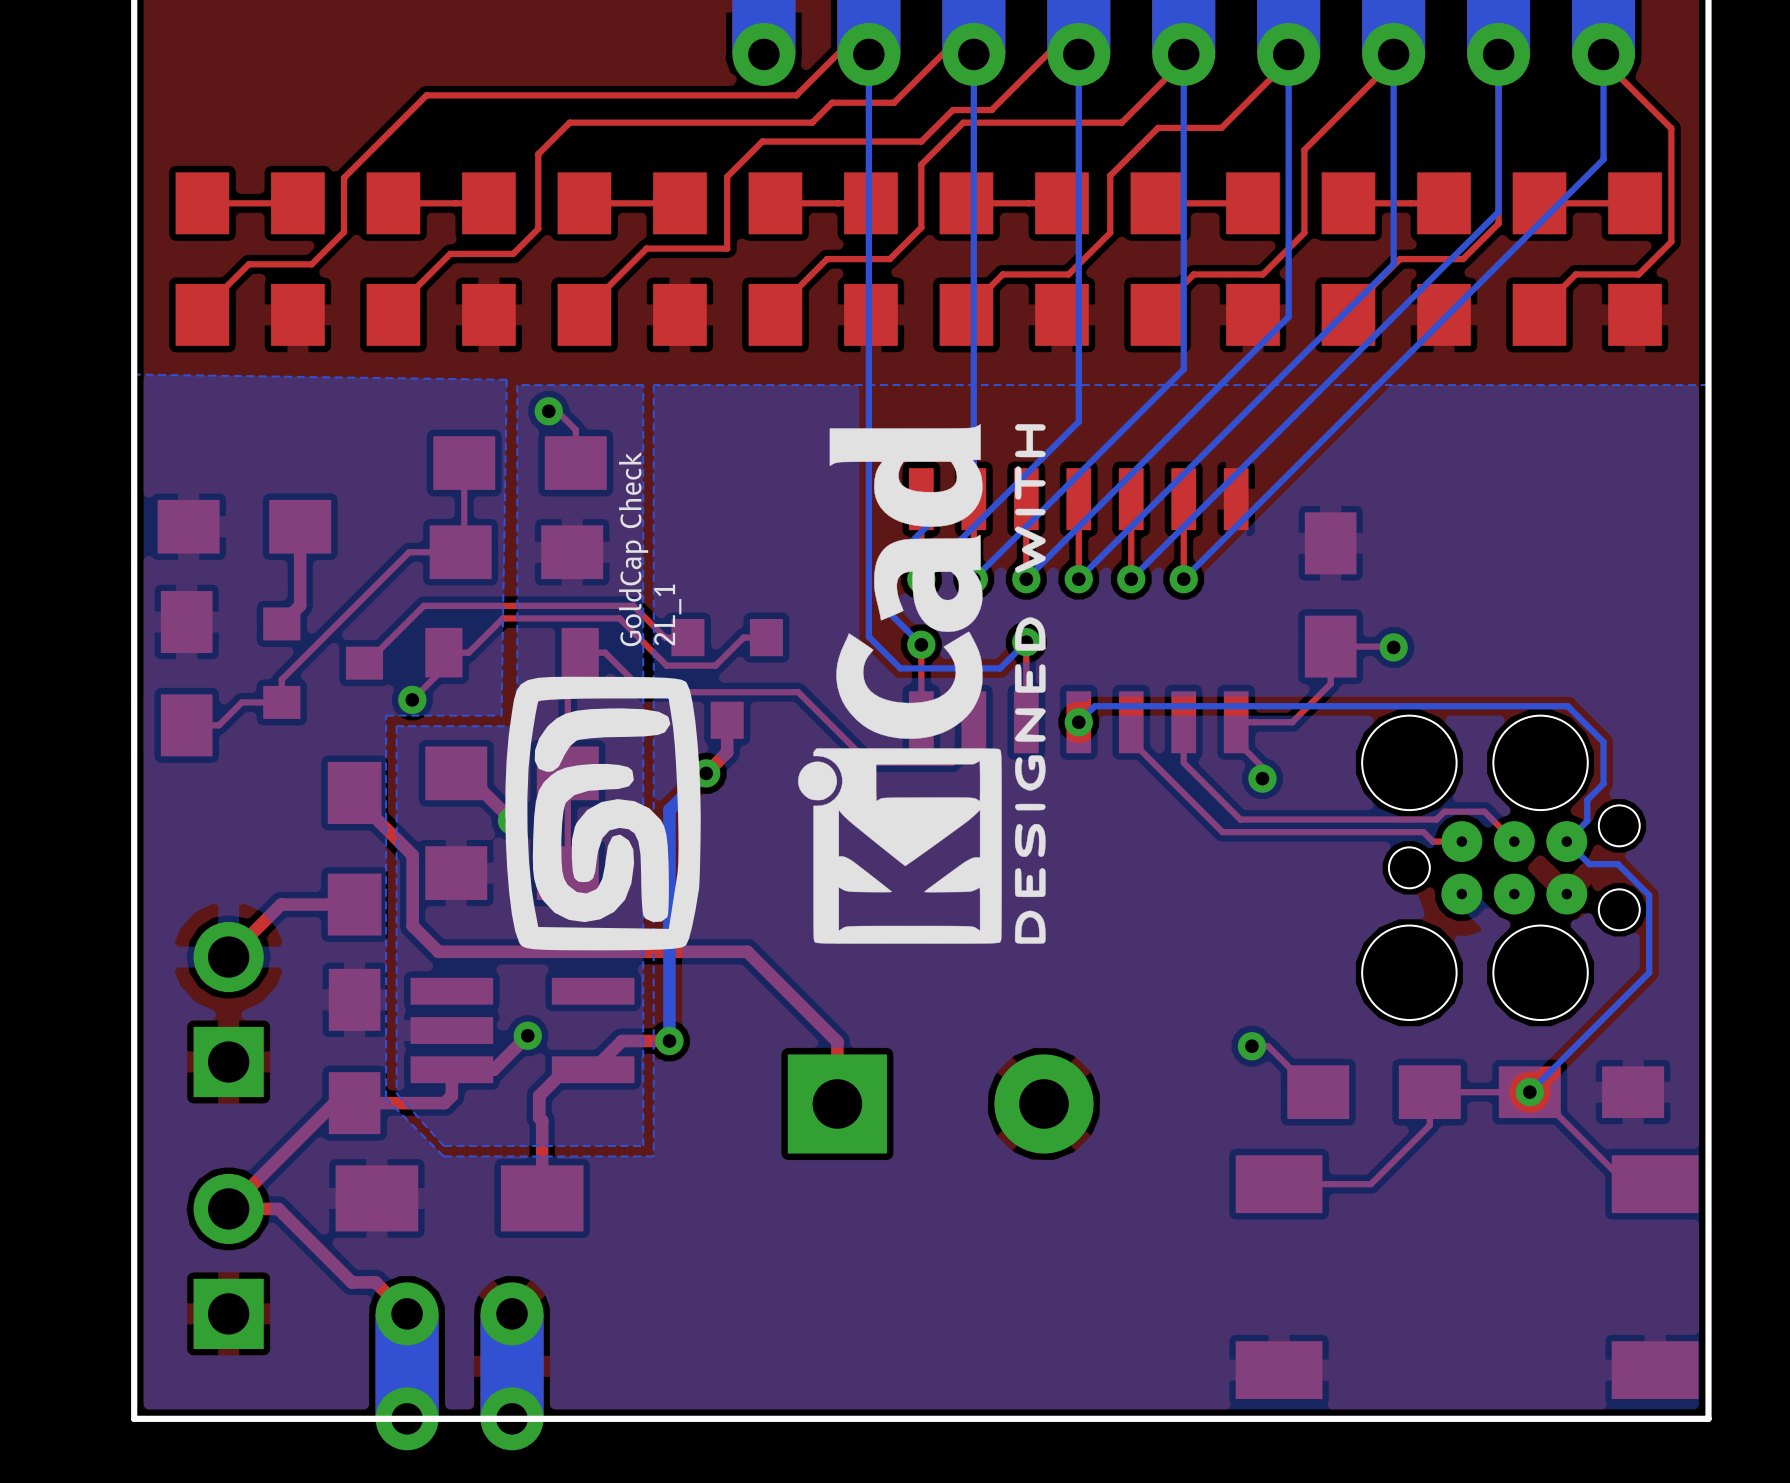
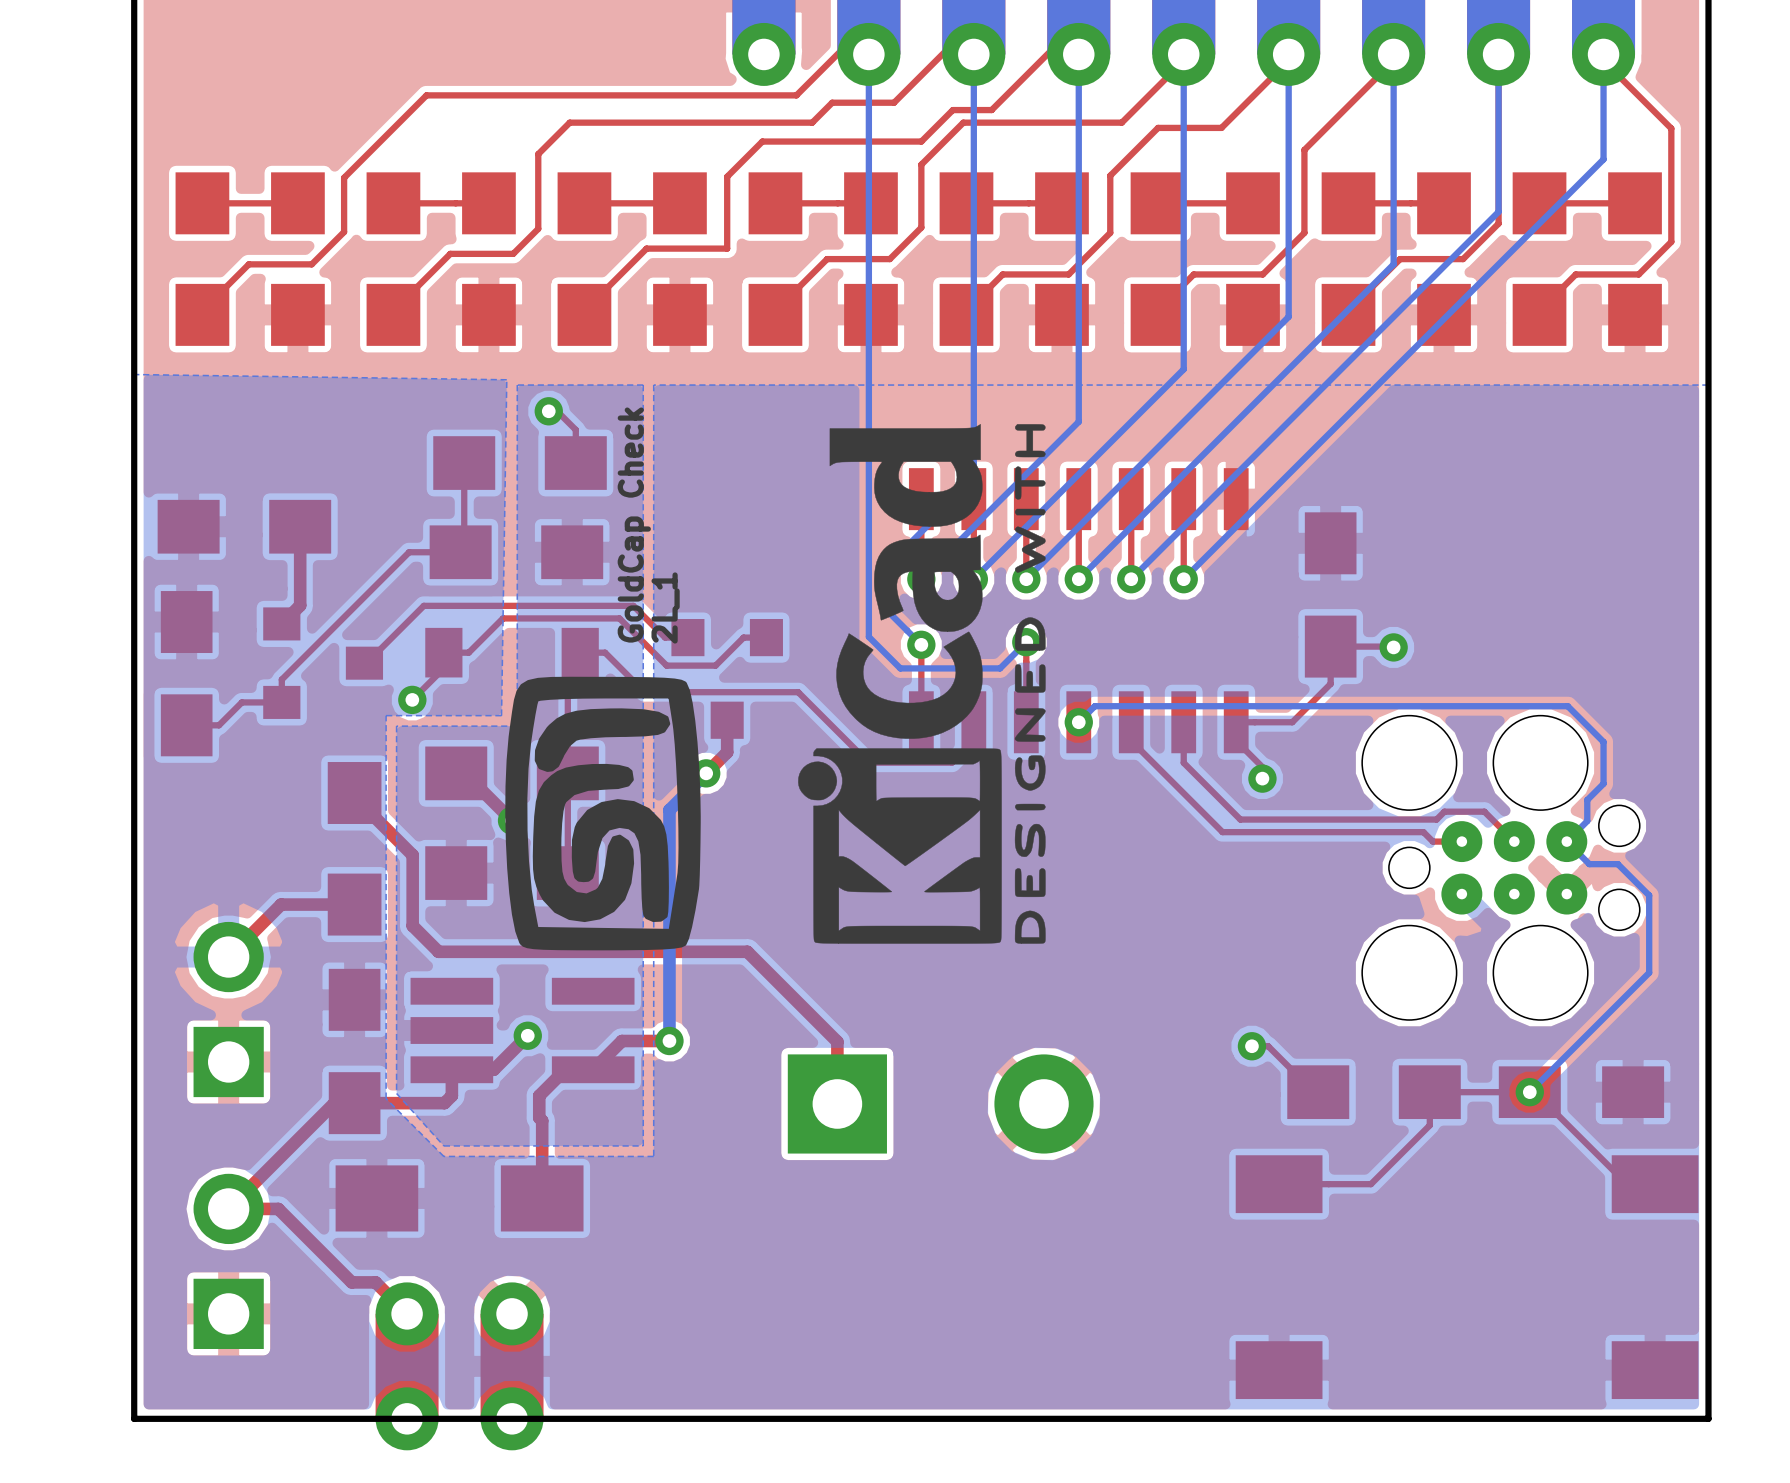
part footprint: [375, 1282, 544, 1451] -> [375, 1282, 544, 1451]

